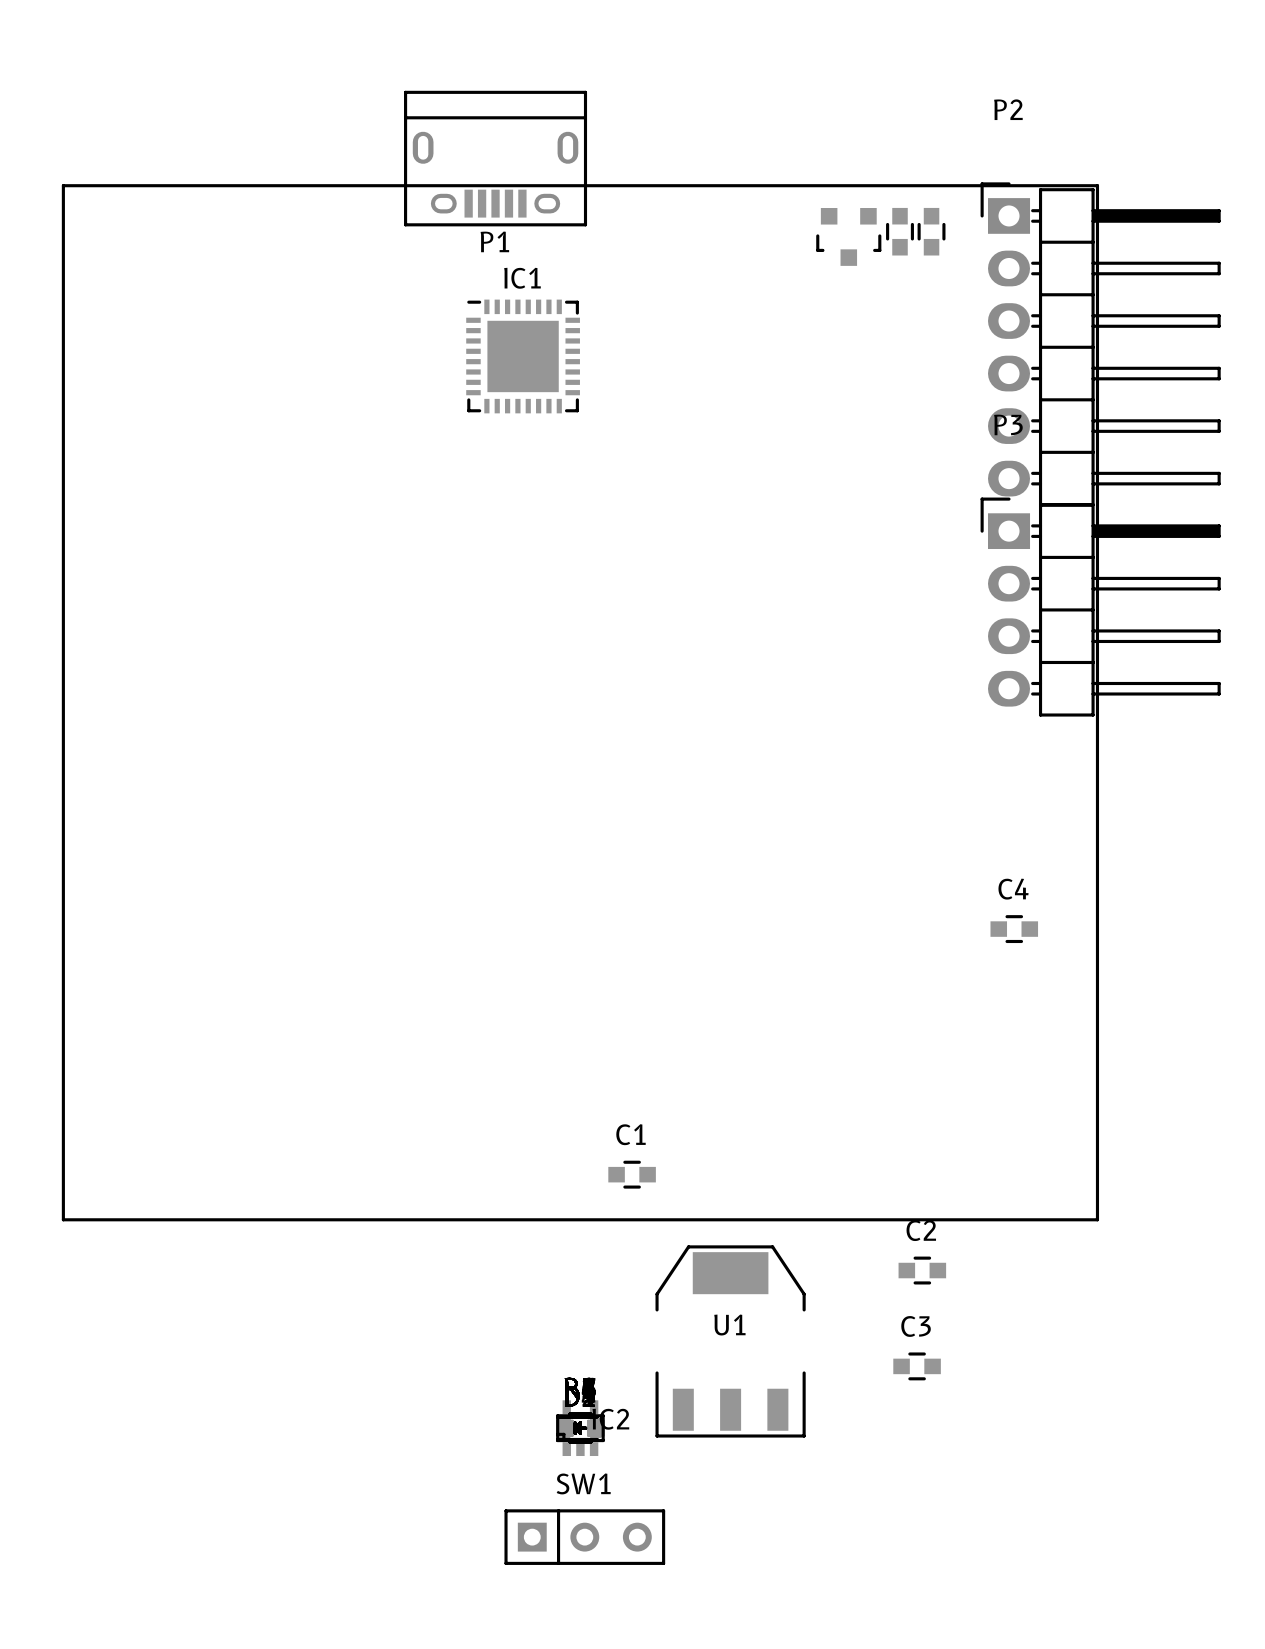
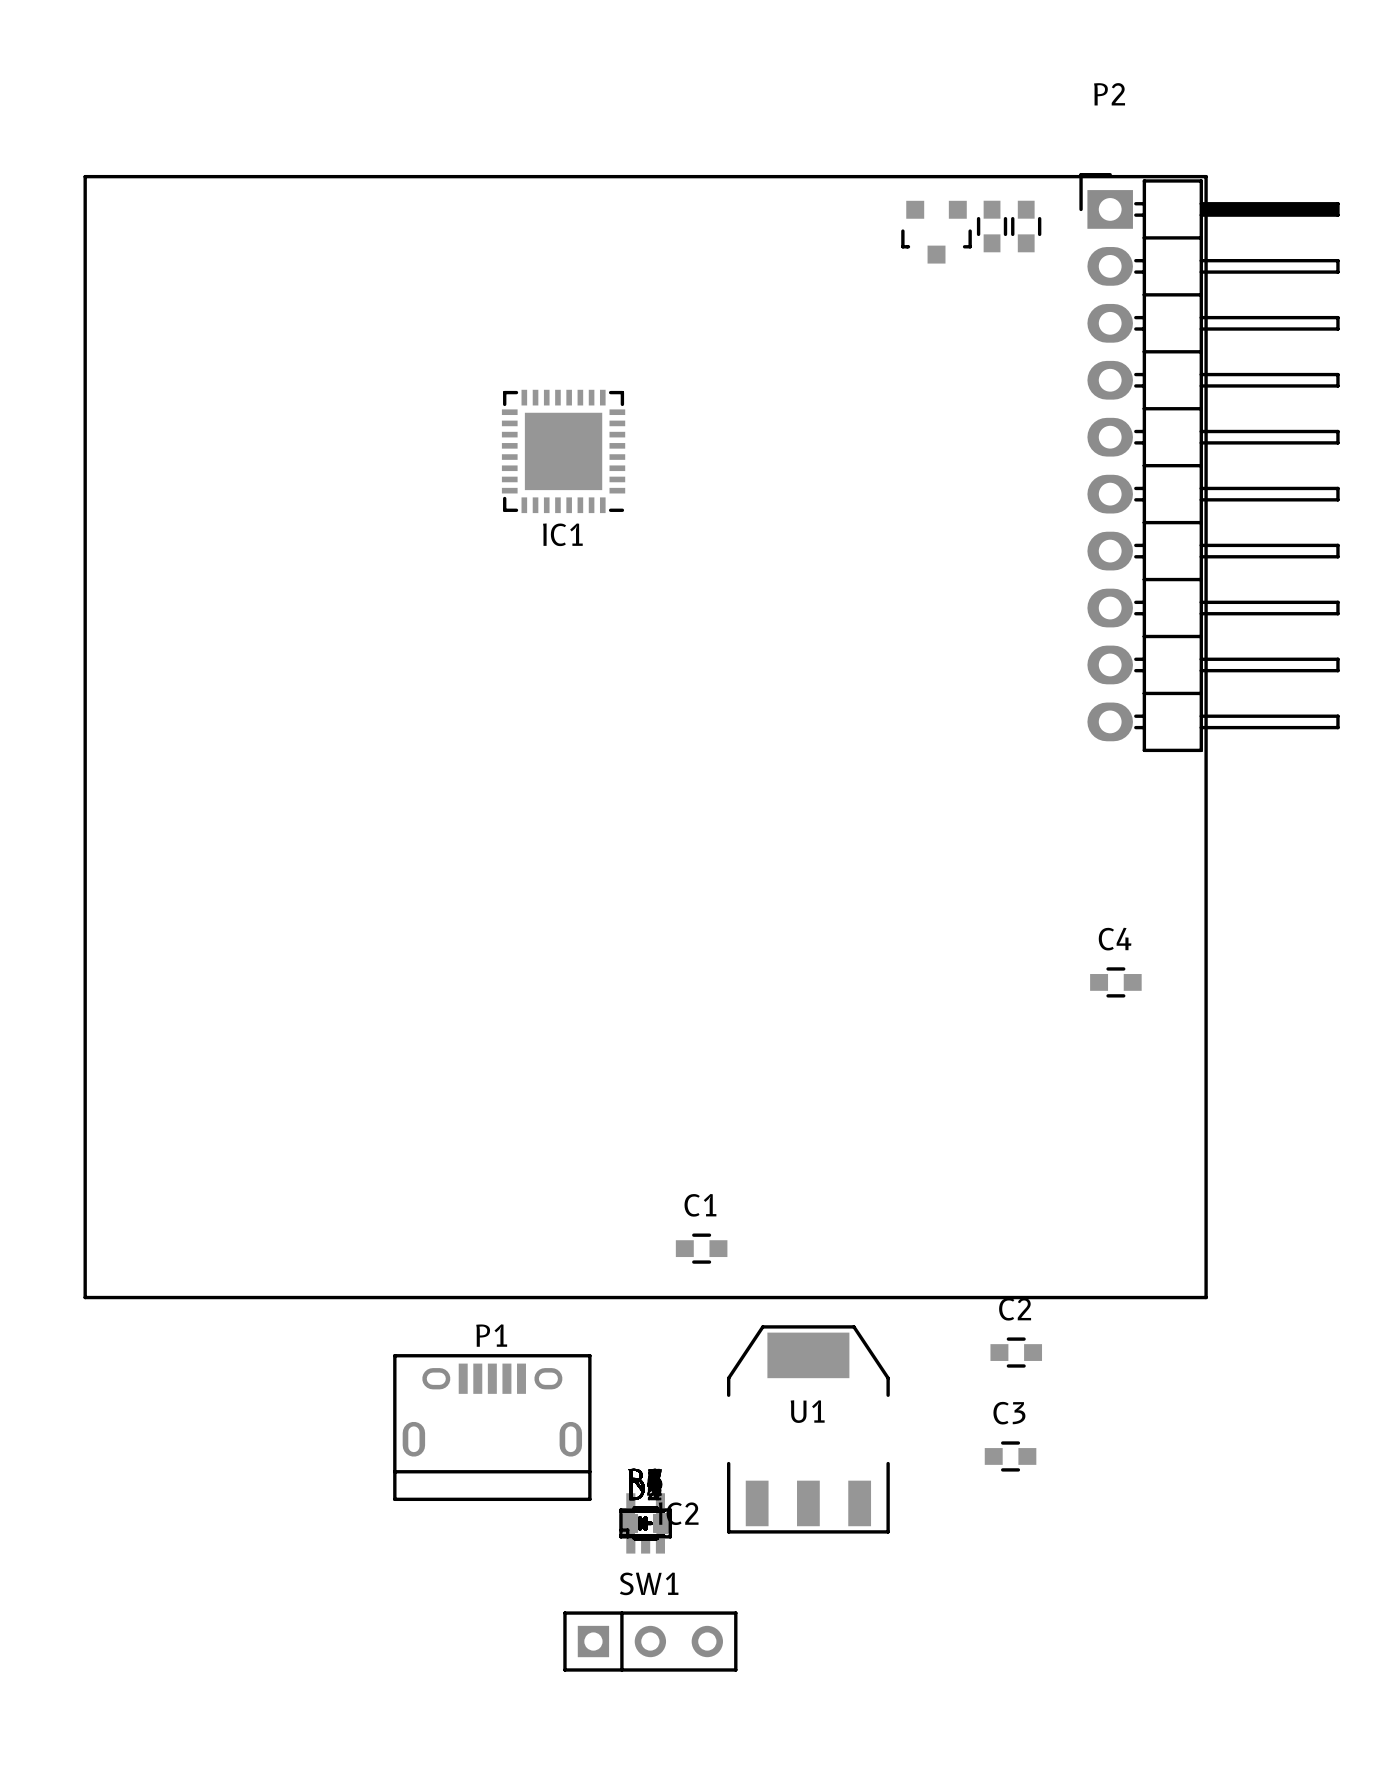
P1 rotation: 0° (495, 158) -> 180° (492, 1427)
P1 position: (495, 158) -> (492, 1427)
P2 footprint: [980, 182, 1221, 507] -> [1079, 173, 1340, 753]
IC1 rotation: 0° (523, 356) -> 180° (563, 451)
IC1 position: (523, 356) -> (563, 451)
P3: (1100, 607) -> none

